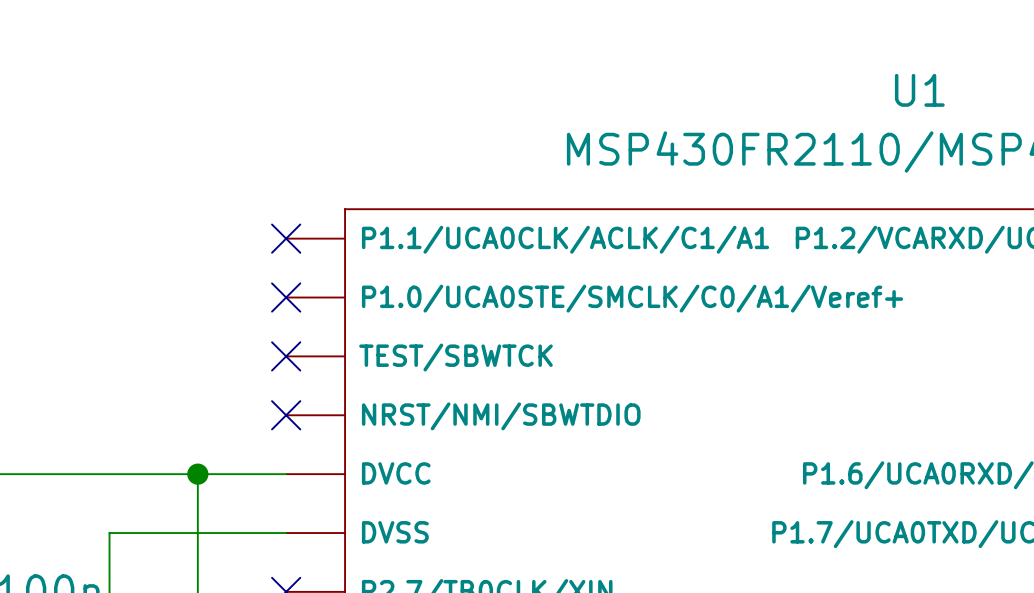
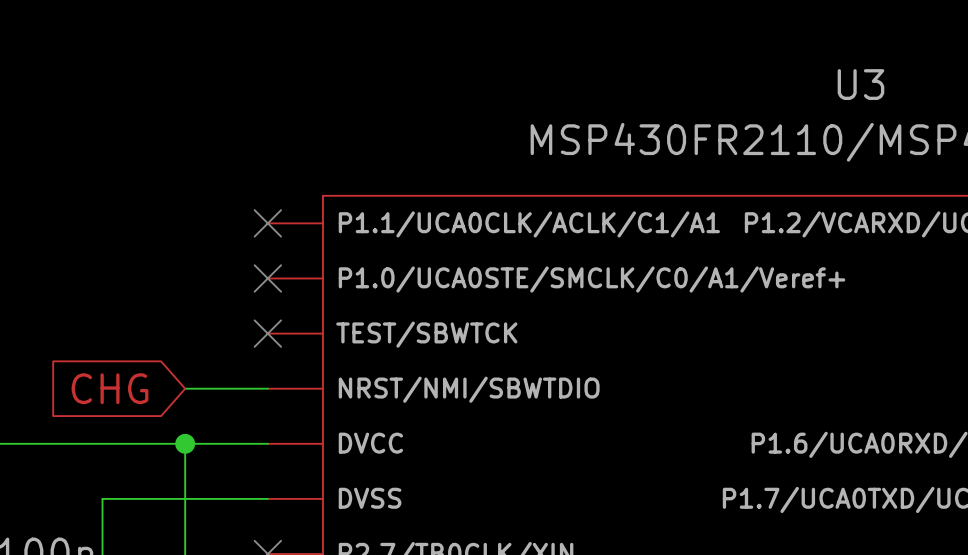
U1 name: U1 (919, 90) -> U3 (860, 84)
global label: none -> CHG (110, 388)
wire: none -> (185, 388) (267, 388)
no-connect mark: (286, 415) -> none

